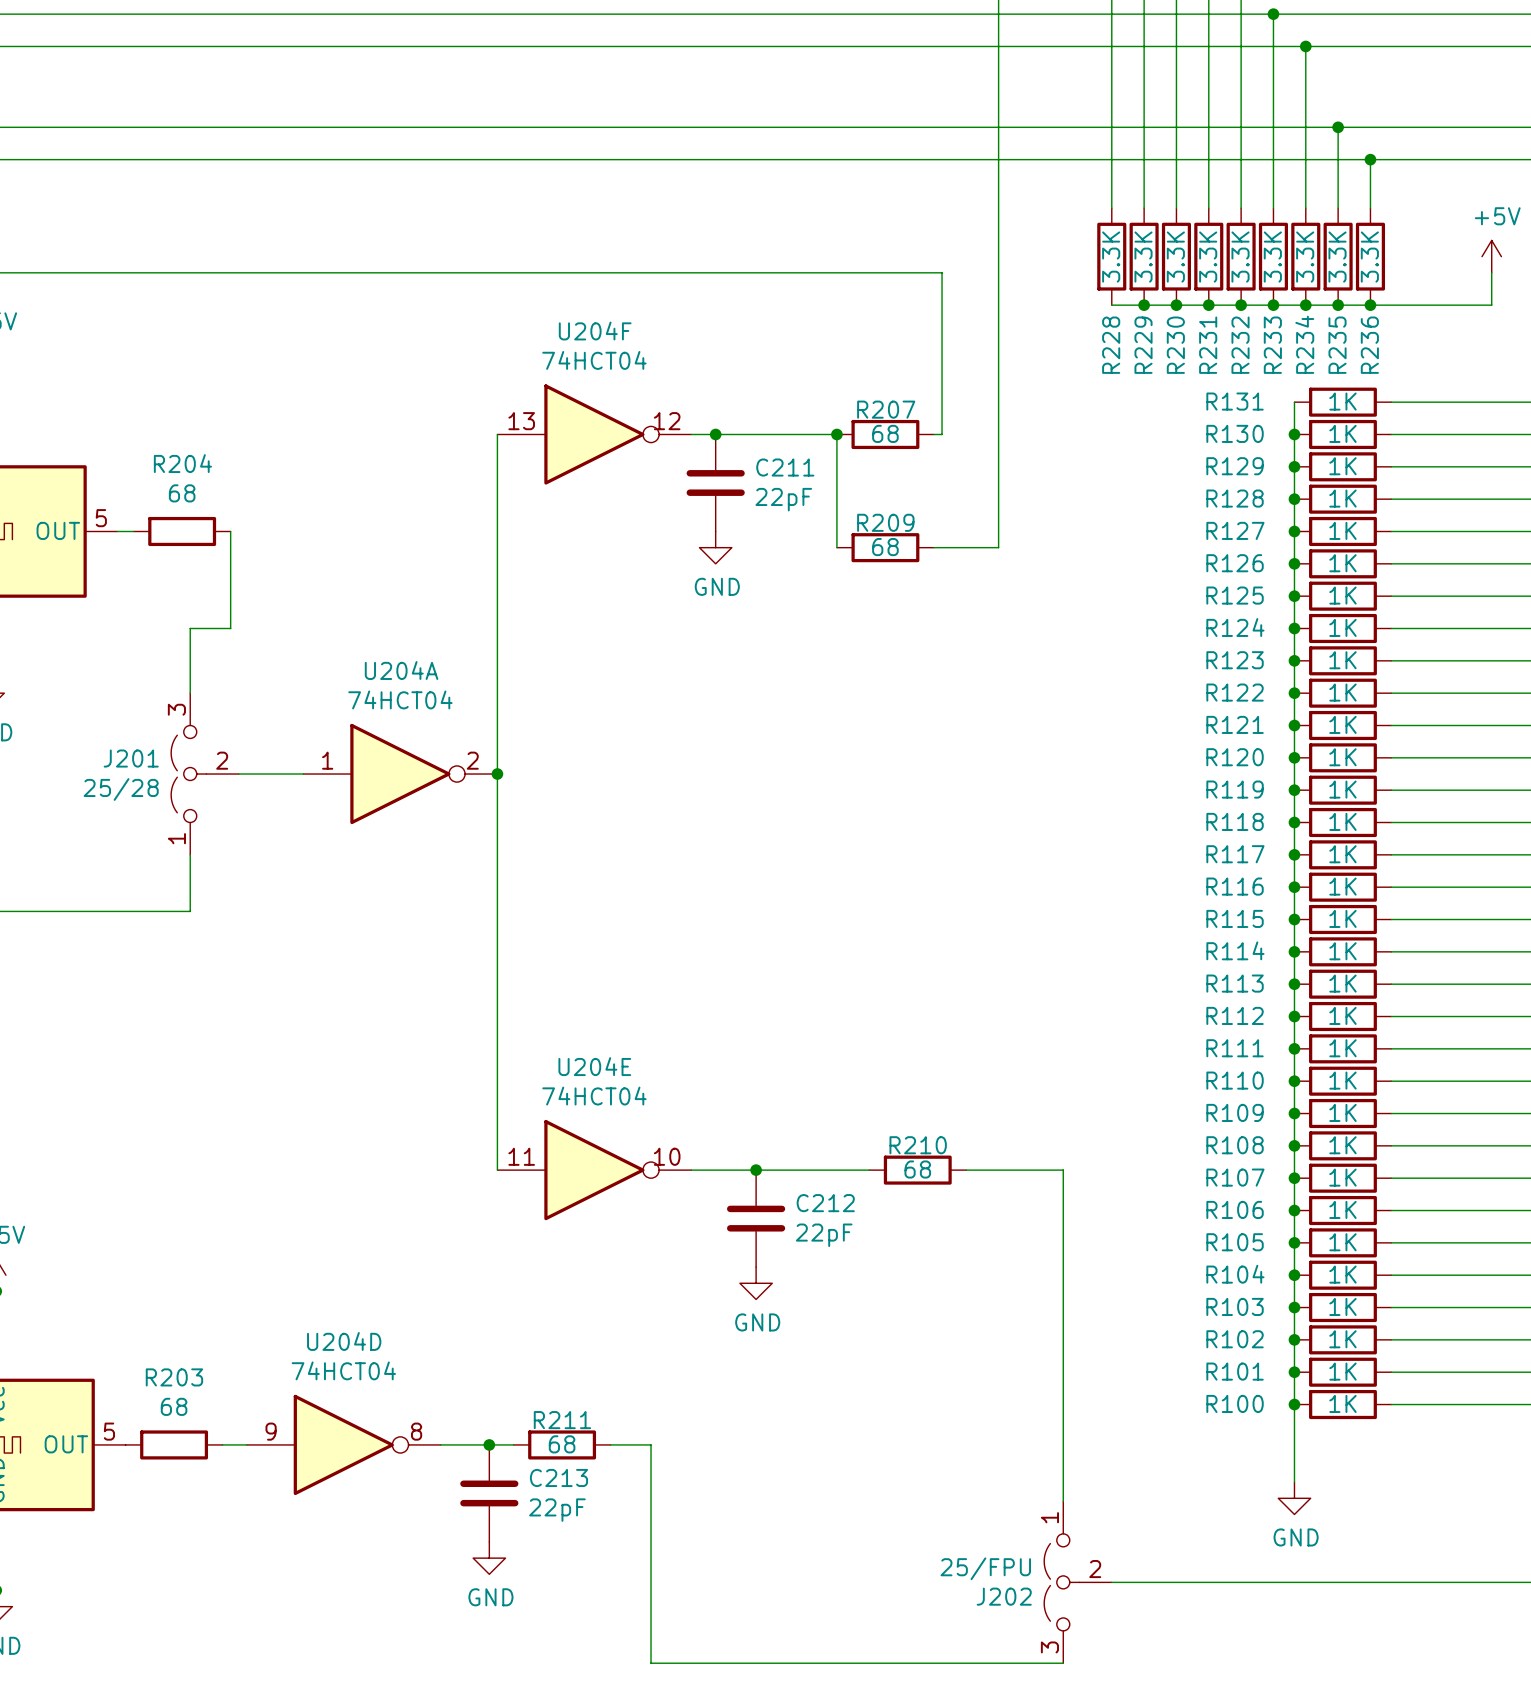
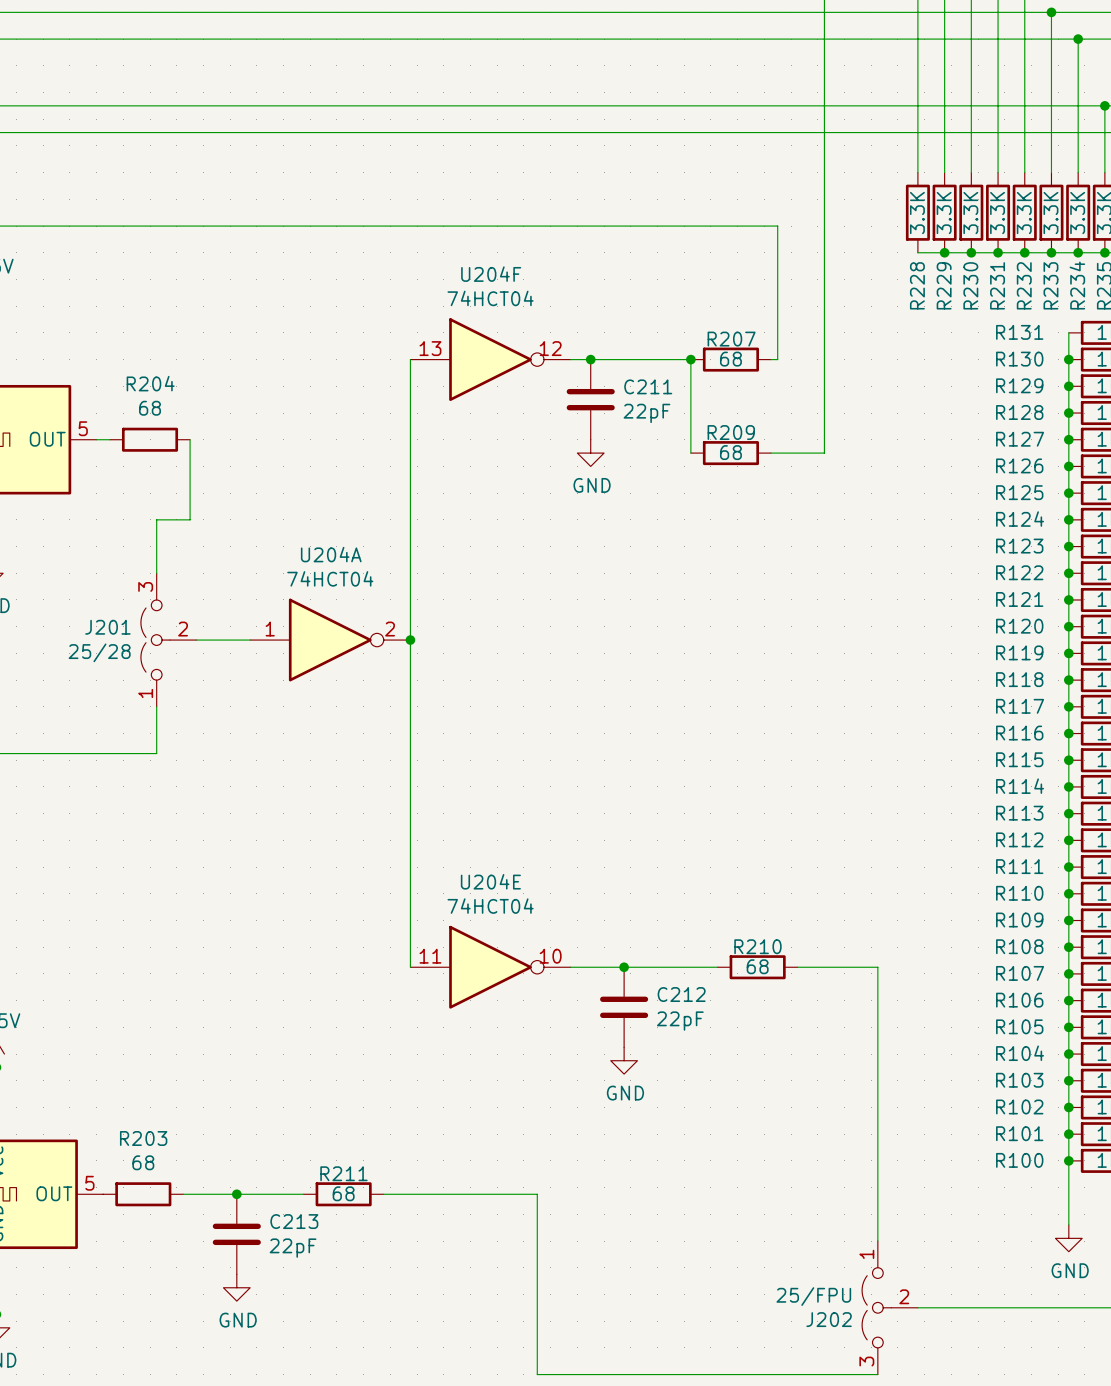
junction: none -> (236, 1194)
U204D: 74HCT04 (343, 1444) -> none
junction: (489, 1444) -> none
wire: none -> (423, 1194) (503, 1194)
R211 position: (562, 1444) -> (343, 1194)
C213 position: (489, 1493) -> (236, 1234)
power symbol position: GND (489, 1558) -> GND (236, 1287)

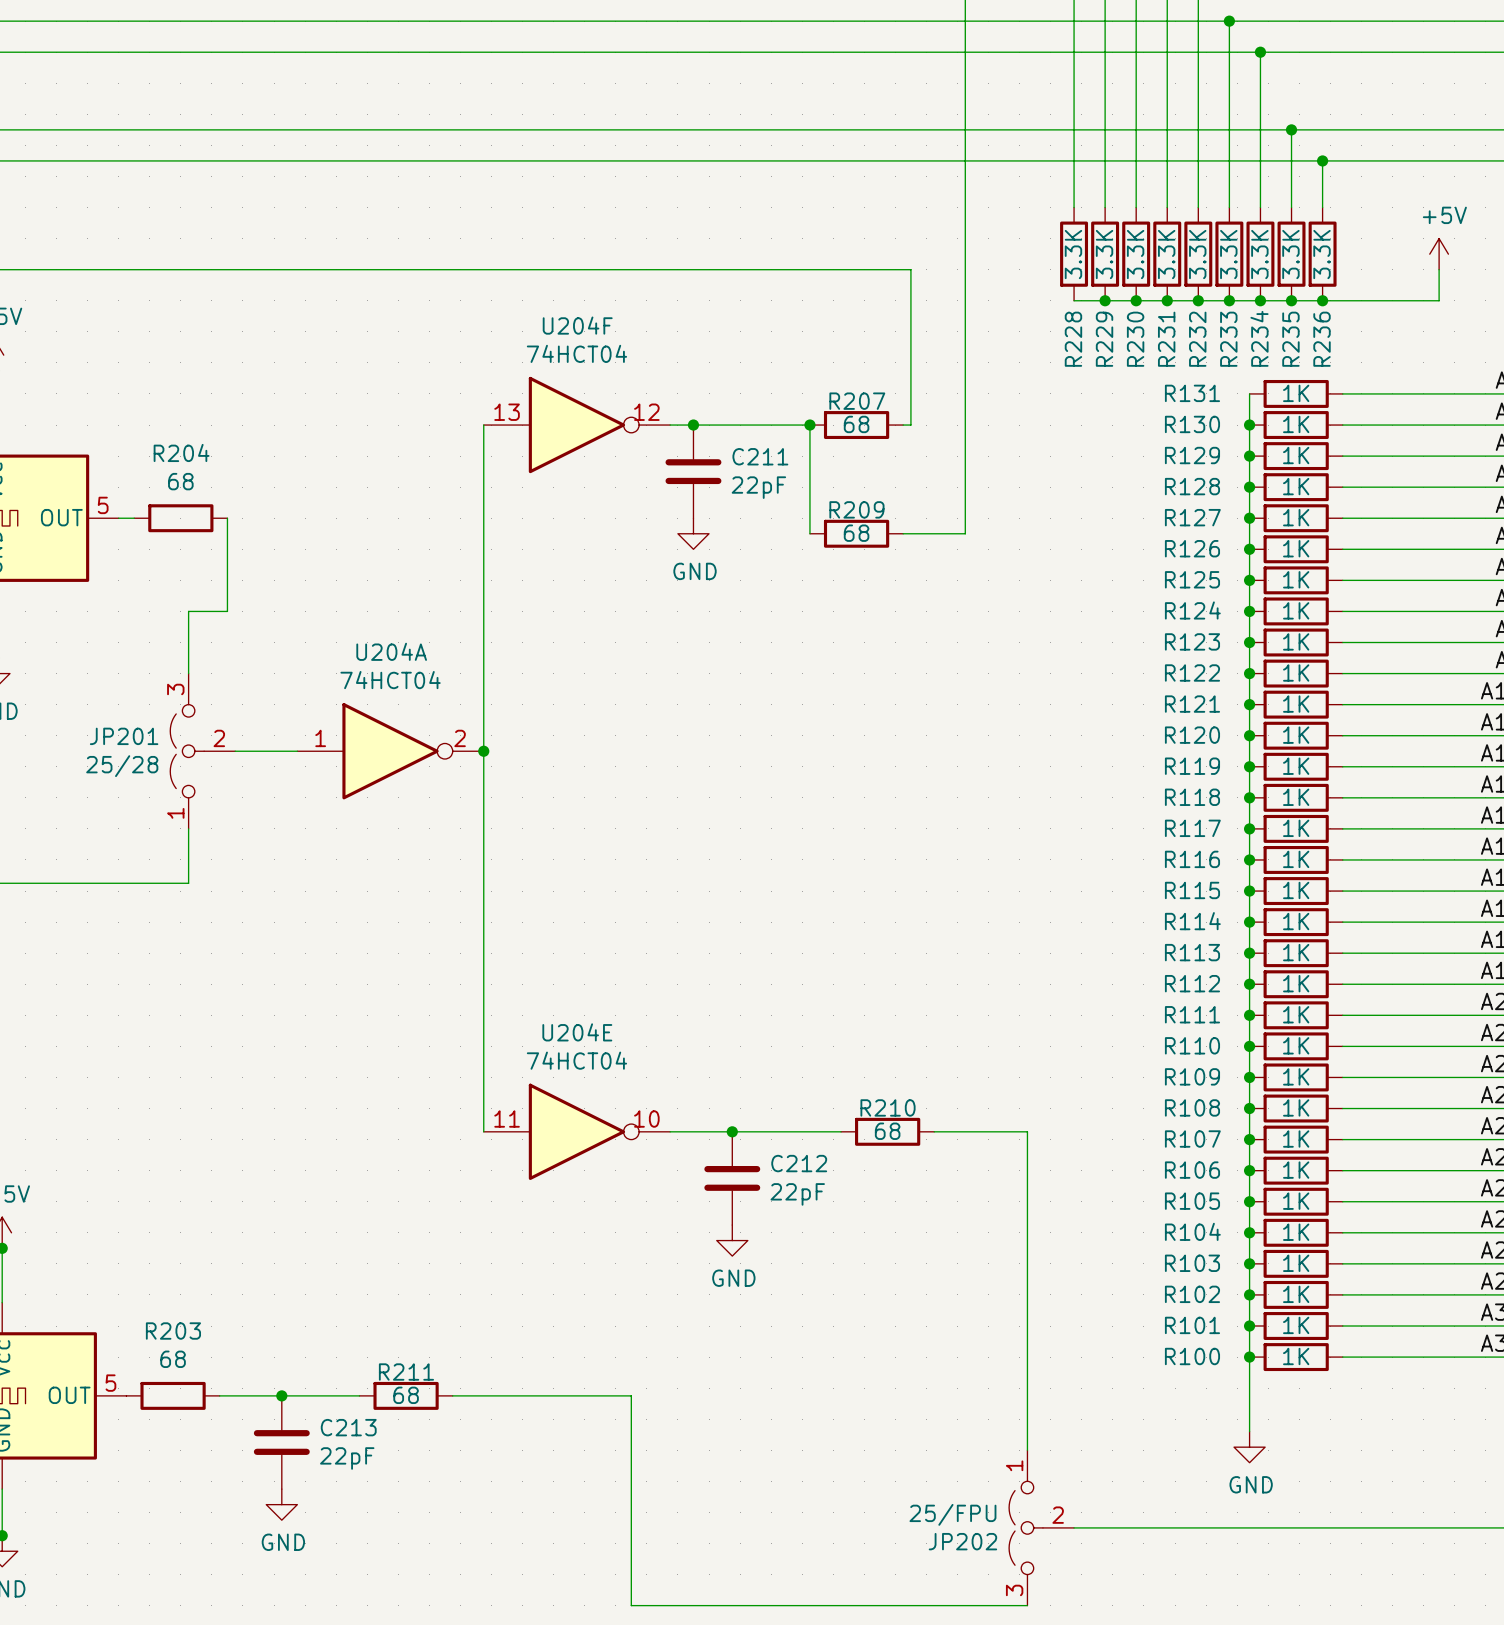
J201 name: J201 (107, 627) -> JP201 (124, 736)
J202 name: J202 (829, 1319) -> JP202 (962, 1541)

